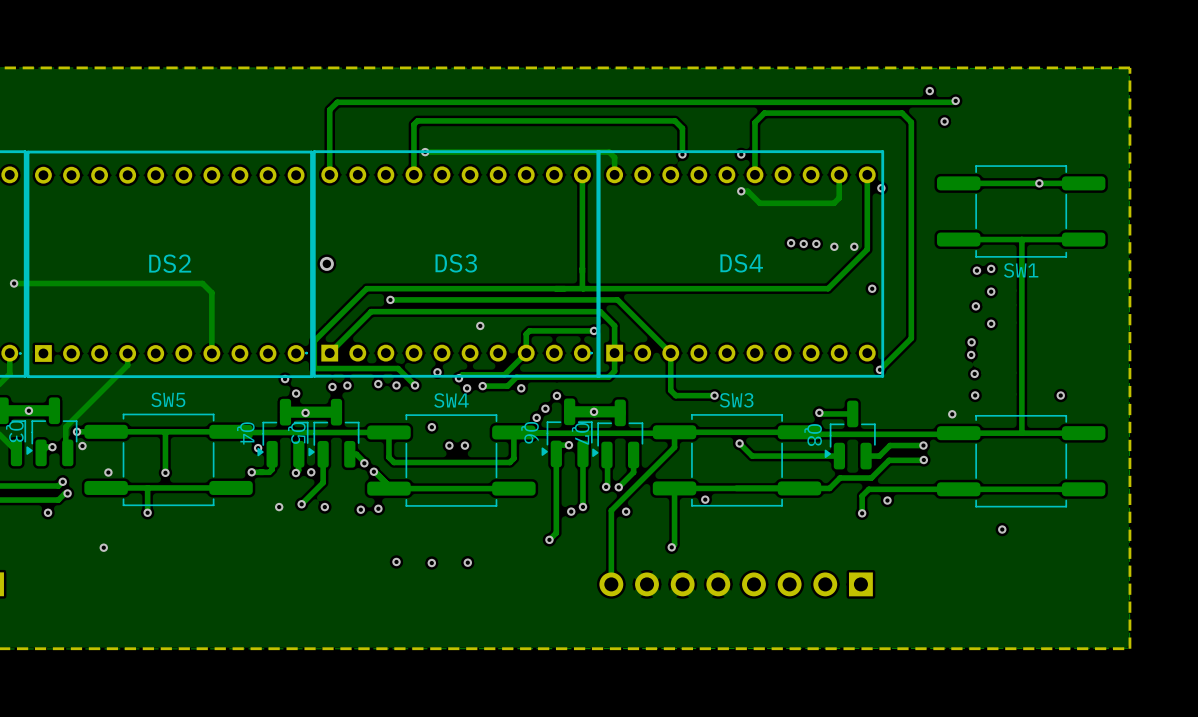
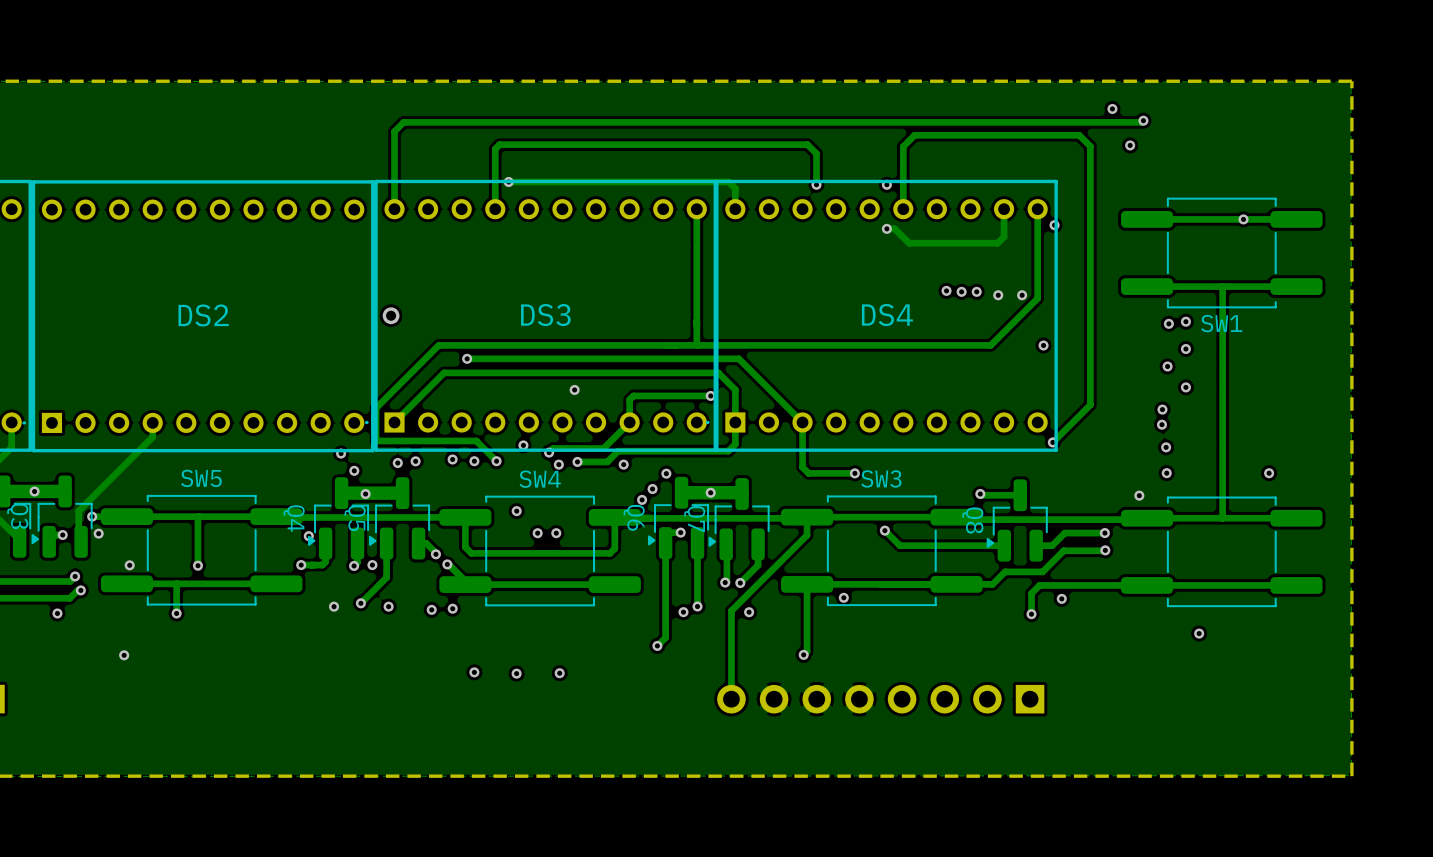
track: (14, 283) (202, 283) (211, 292) (211, 353) -> none
via: (14, 283) -> none

